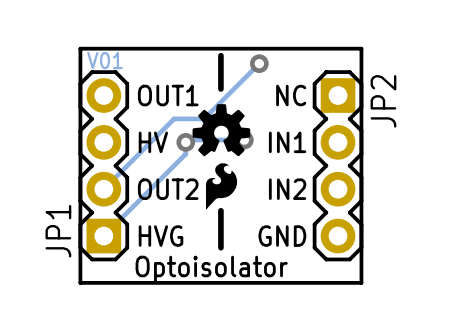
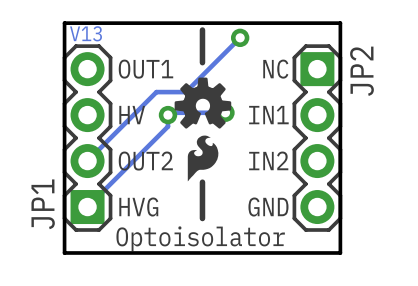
text: V01 (105, 60) -> V13 (86, 33)

